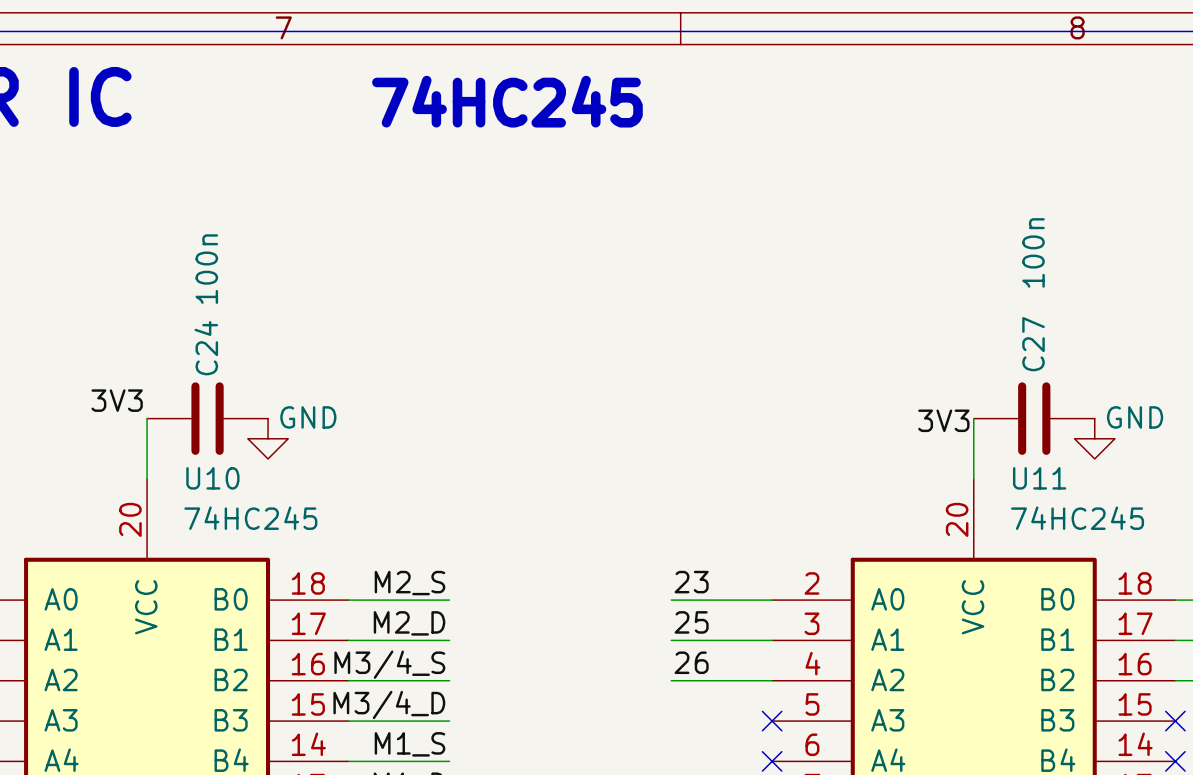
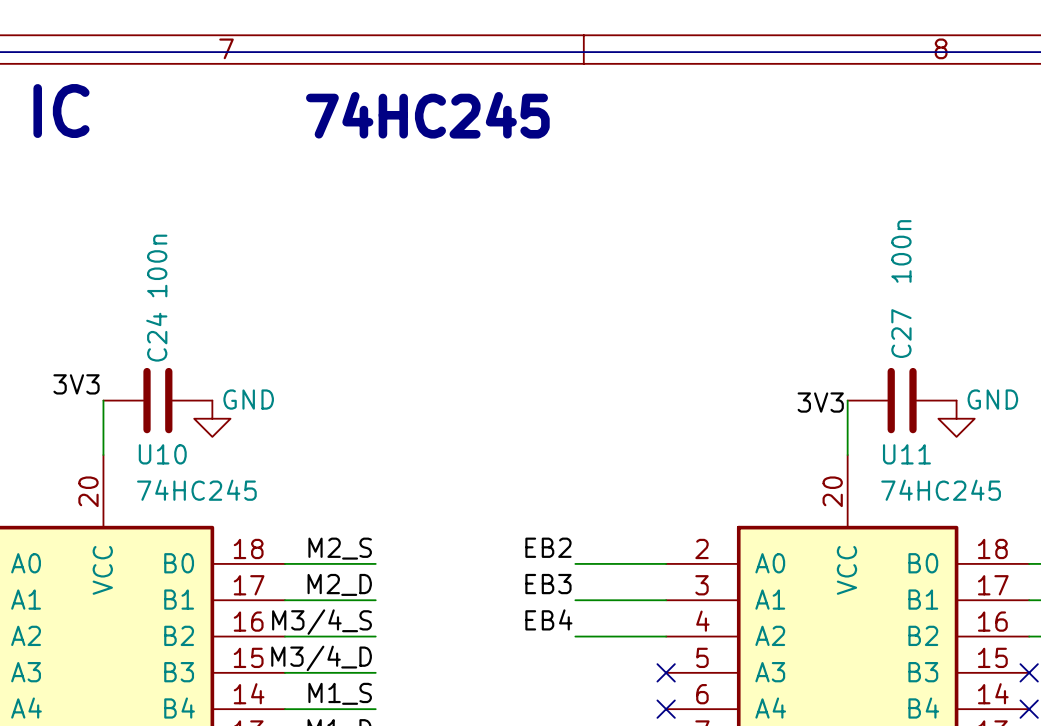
label: 23 (691, 582) -> EB2 (548, 547)
label: 25 (691, 622) -> EB3 (548, 584)
label: 26 (691, 662) -> EB4 (548, 619)

